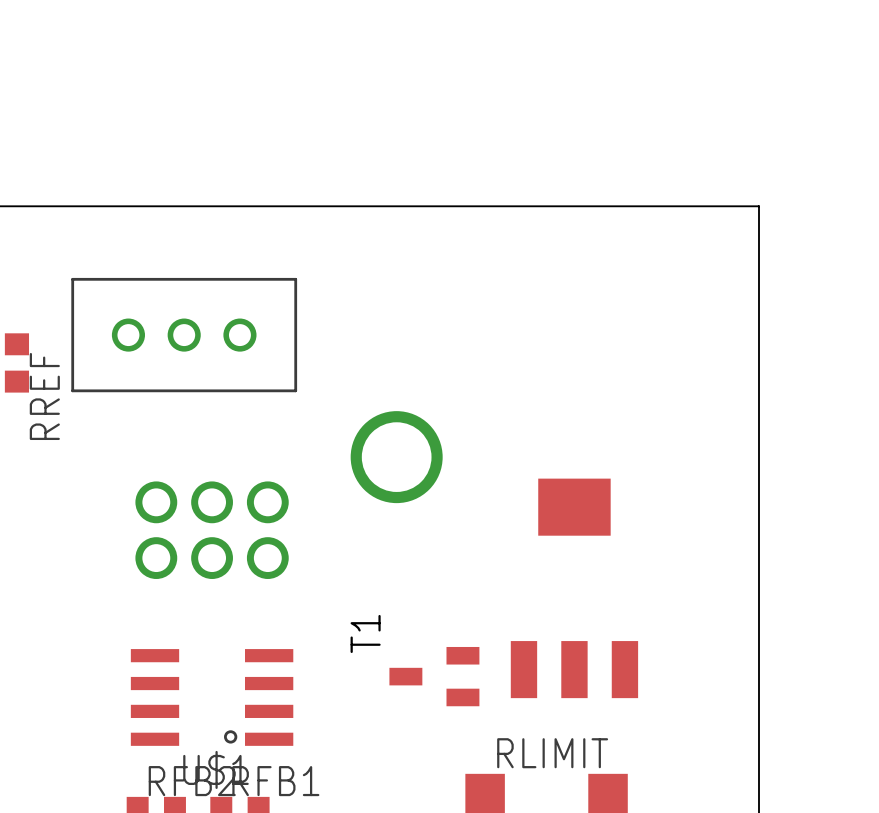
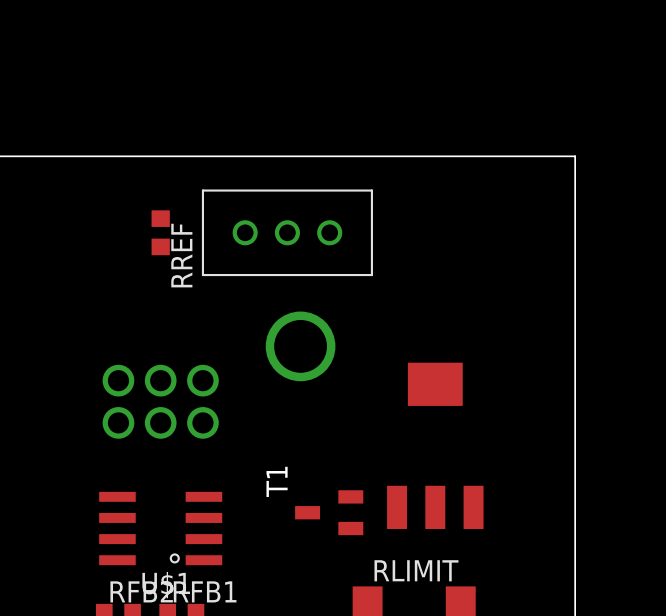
part position: (184, 335) -> (287, 232)
RREF position: (16, 362) -> (160, 232)

